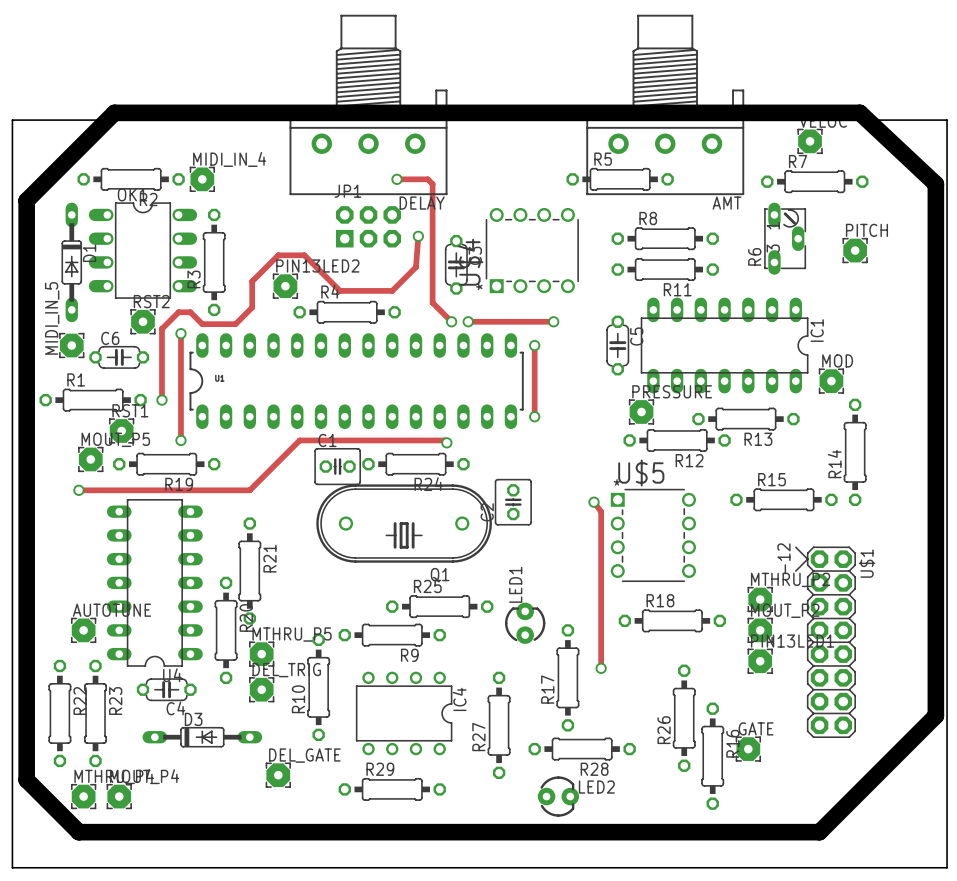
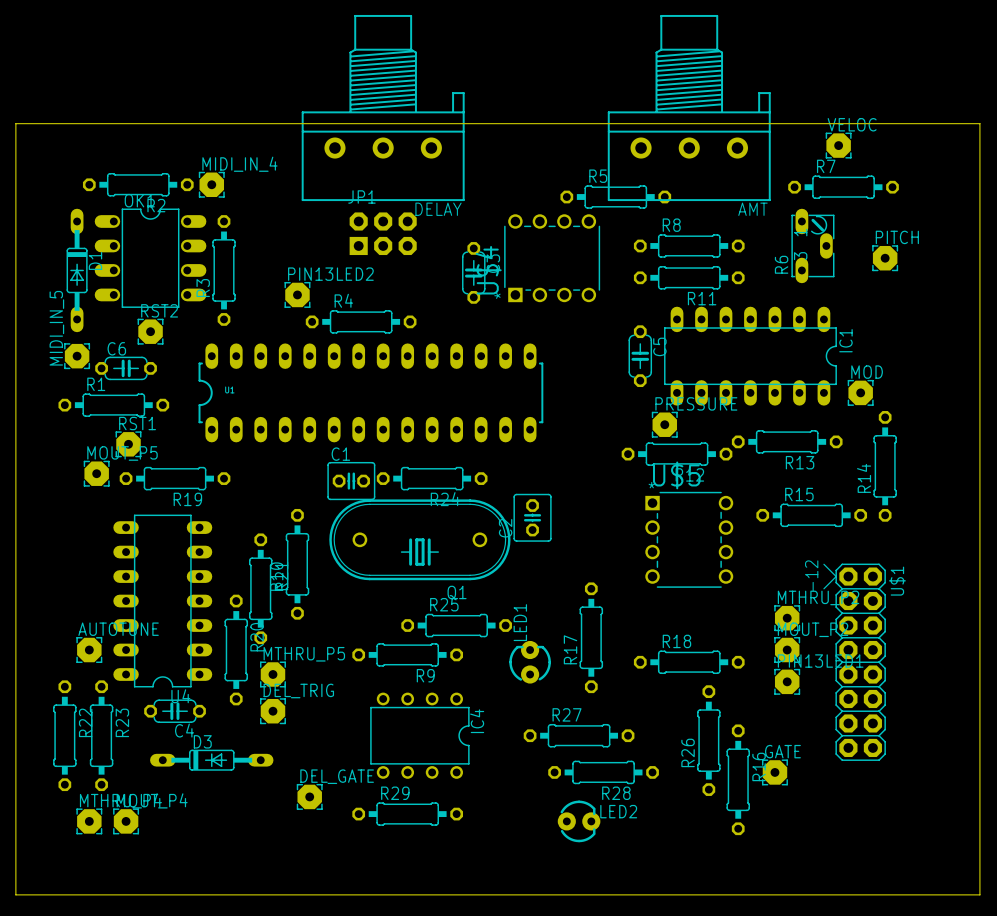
board edge: (114, 112) (859, 112) (935, 184) (935, 715) (819, 832) (78, 832) (26, 779) (26, 200) (114, 112) -> none
track: (397, 179) (427, 179) (432, 184) (432, 302) (451, 321) -> none
via: (397, 179) -> none
R5 position: (620, 179) -> (615, 197)
track: (418, 236) (415, 267) (392, 290) (340, 290) (304, 255) (278, 255) (252, 281) (252, 307) (235, 324) (202, 324) (190, 312) (178, 312) (161, 328) (161, 400) -> none
via: (418, 236) -> none
via: (451, 321) -> none
track: (468, 321) (556, 321) -> none
via: (468, 321) -> none
via: (553, 321) -> none
track: (180, 333) (180, 440) -> none
via: (180, 333) -> none
track: (534, 345) (534, 416) -> none
via: (534, 345) -> none
R1 position: (93, 400) -> (113, 405)
via: (161, 400) -> none
via: (534, 416) -> none
R13 position: (745, 419) -> (787, 441)
via: (180, 440) -> none
R12 position: (677, 440) -> (677, 454)
track: (446, 442) (444, 440) (299, 440) (249, 490) (78, 490) -> none
via: (446, 442) -> none
via: (78, 490) -> none
track: (594, 502) (601, 511) (601, 668) -> none
via: (594, 502) -> none
U$5 position: (653, 535) -> (689, 539)
R18 position: (672, 620) -> (689, 662)
LED1 position: (525, 623) -> (530, 662)
via: (601, 668) -> none
R17 position: (567, 677) -> (591, 637)
R10 position: (318, 687) -> (297, 564)
R27 rotation: 0° (499, 725) -> 90° clockwise (579, 735)
DEL_GATE position: (278, 775) -> (309, 796)

